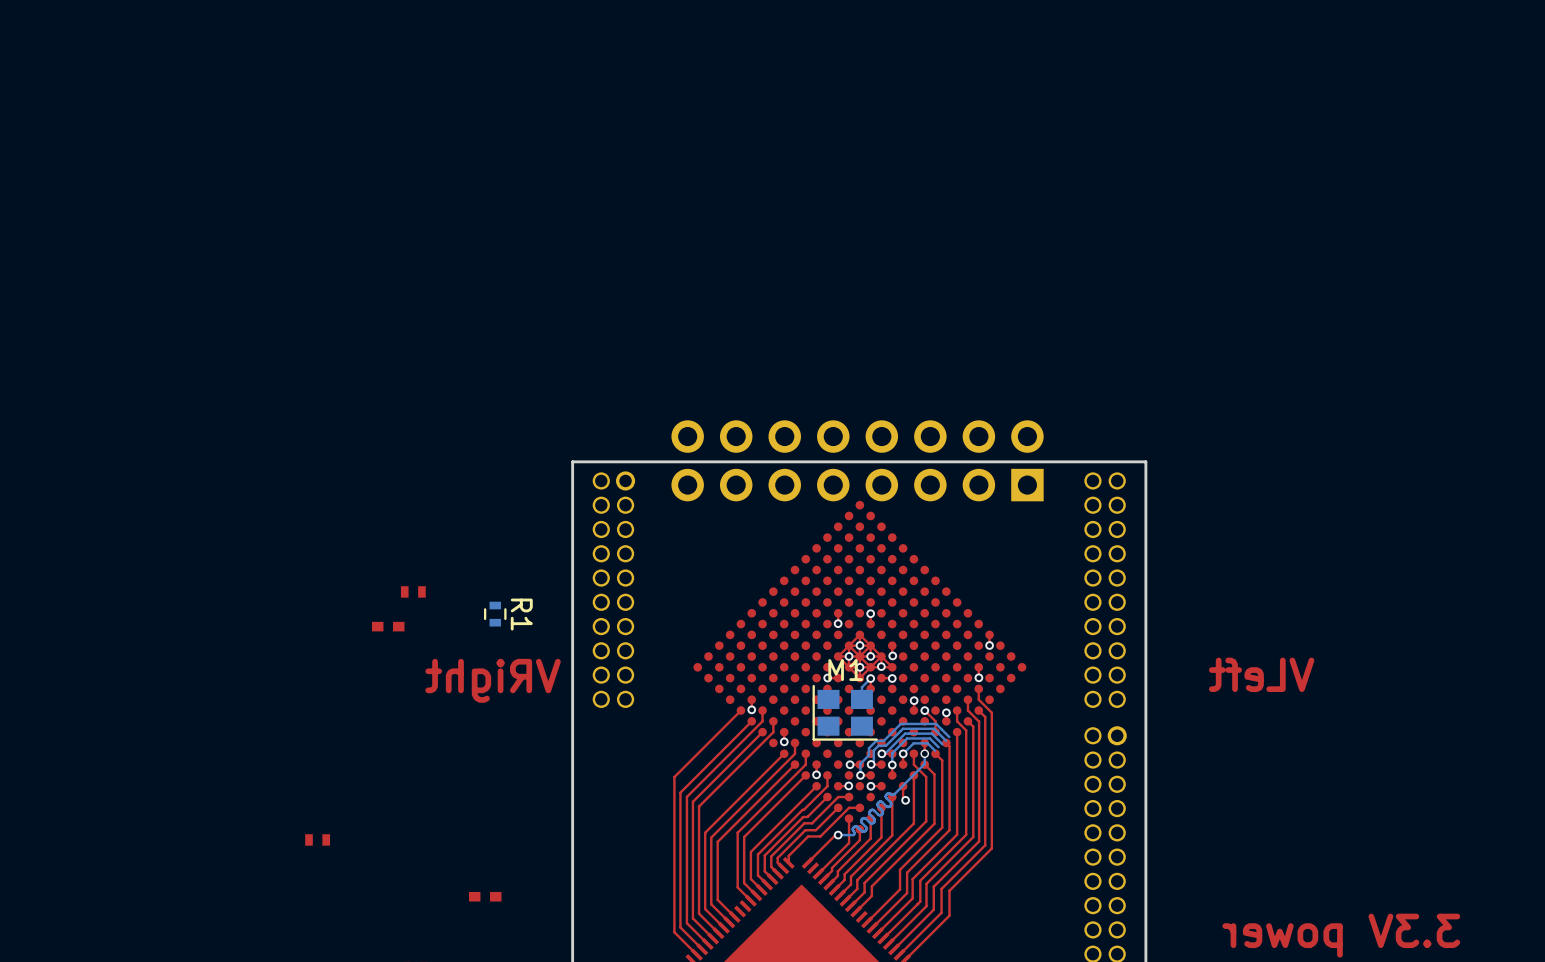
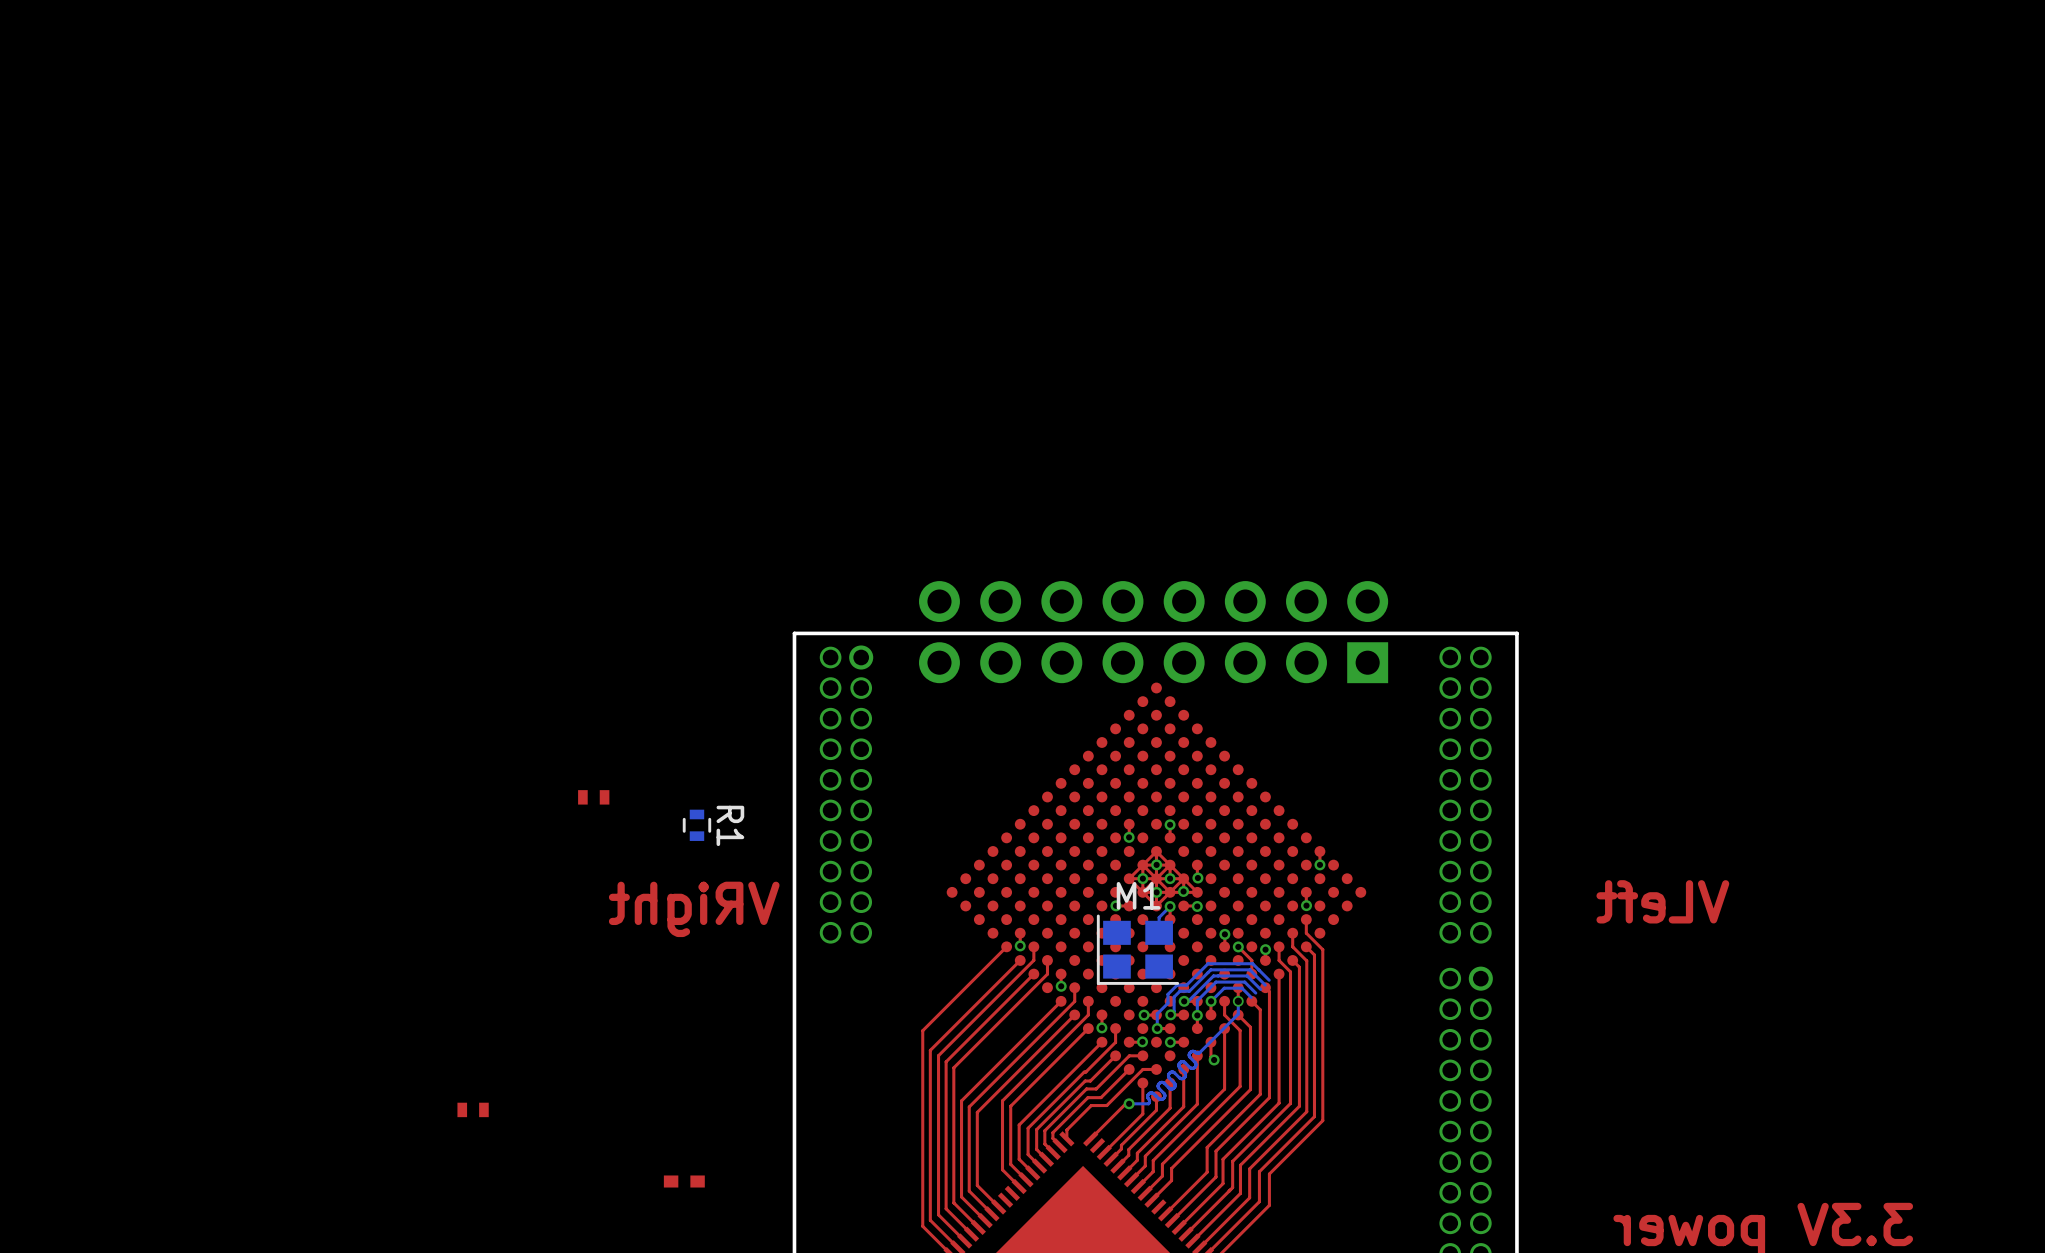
part: (388, 626) -> none

